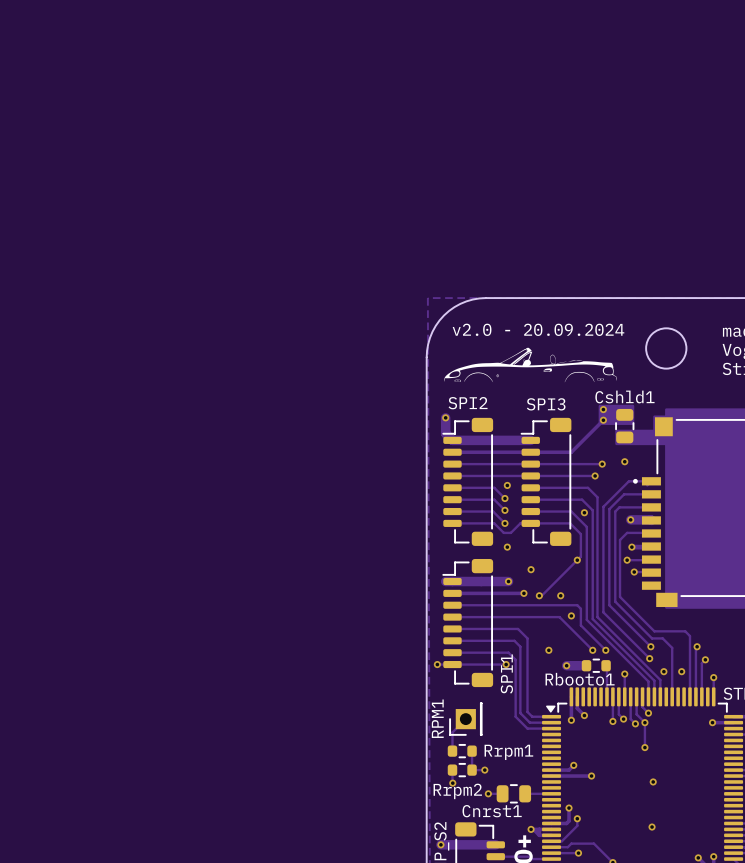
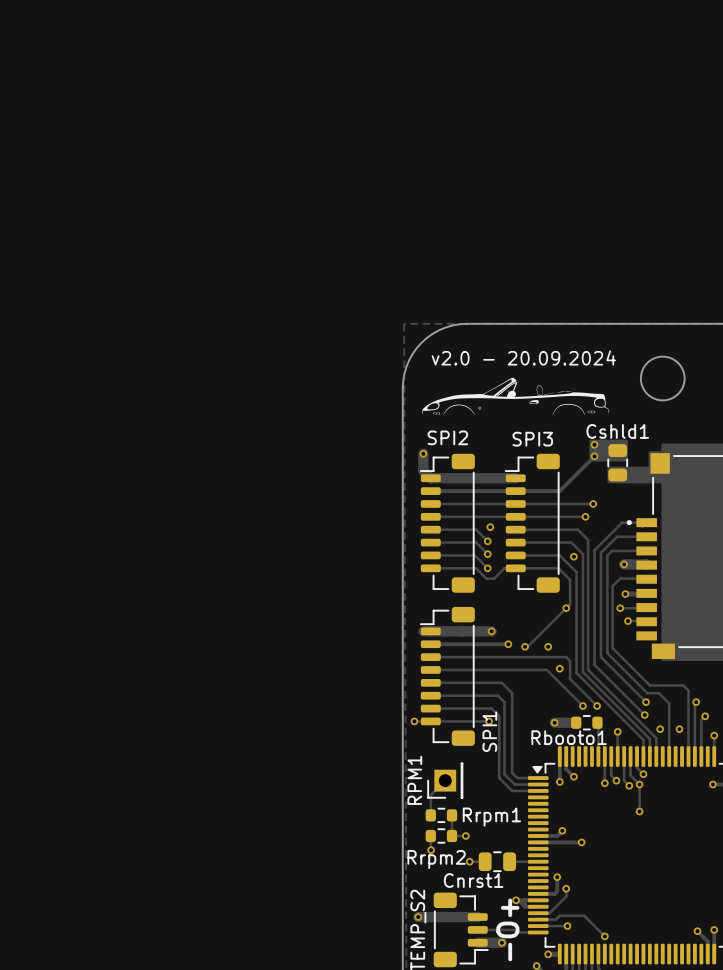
via: (624, 461) -> none
via: (507, 547) -> none
via: (531, 569) -> none
via: (548, 650) -> none
via: (653, 781) -> none
via: (652, 827) -> none

